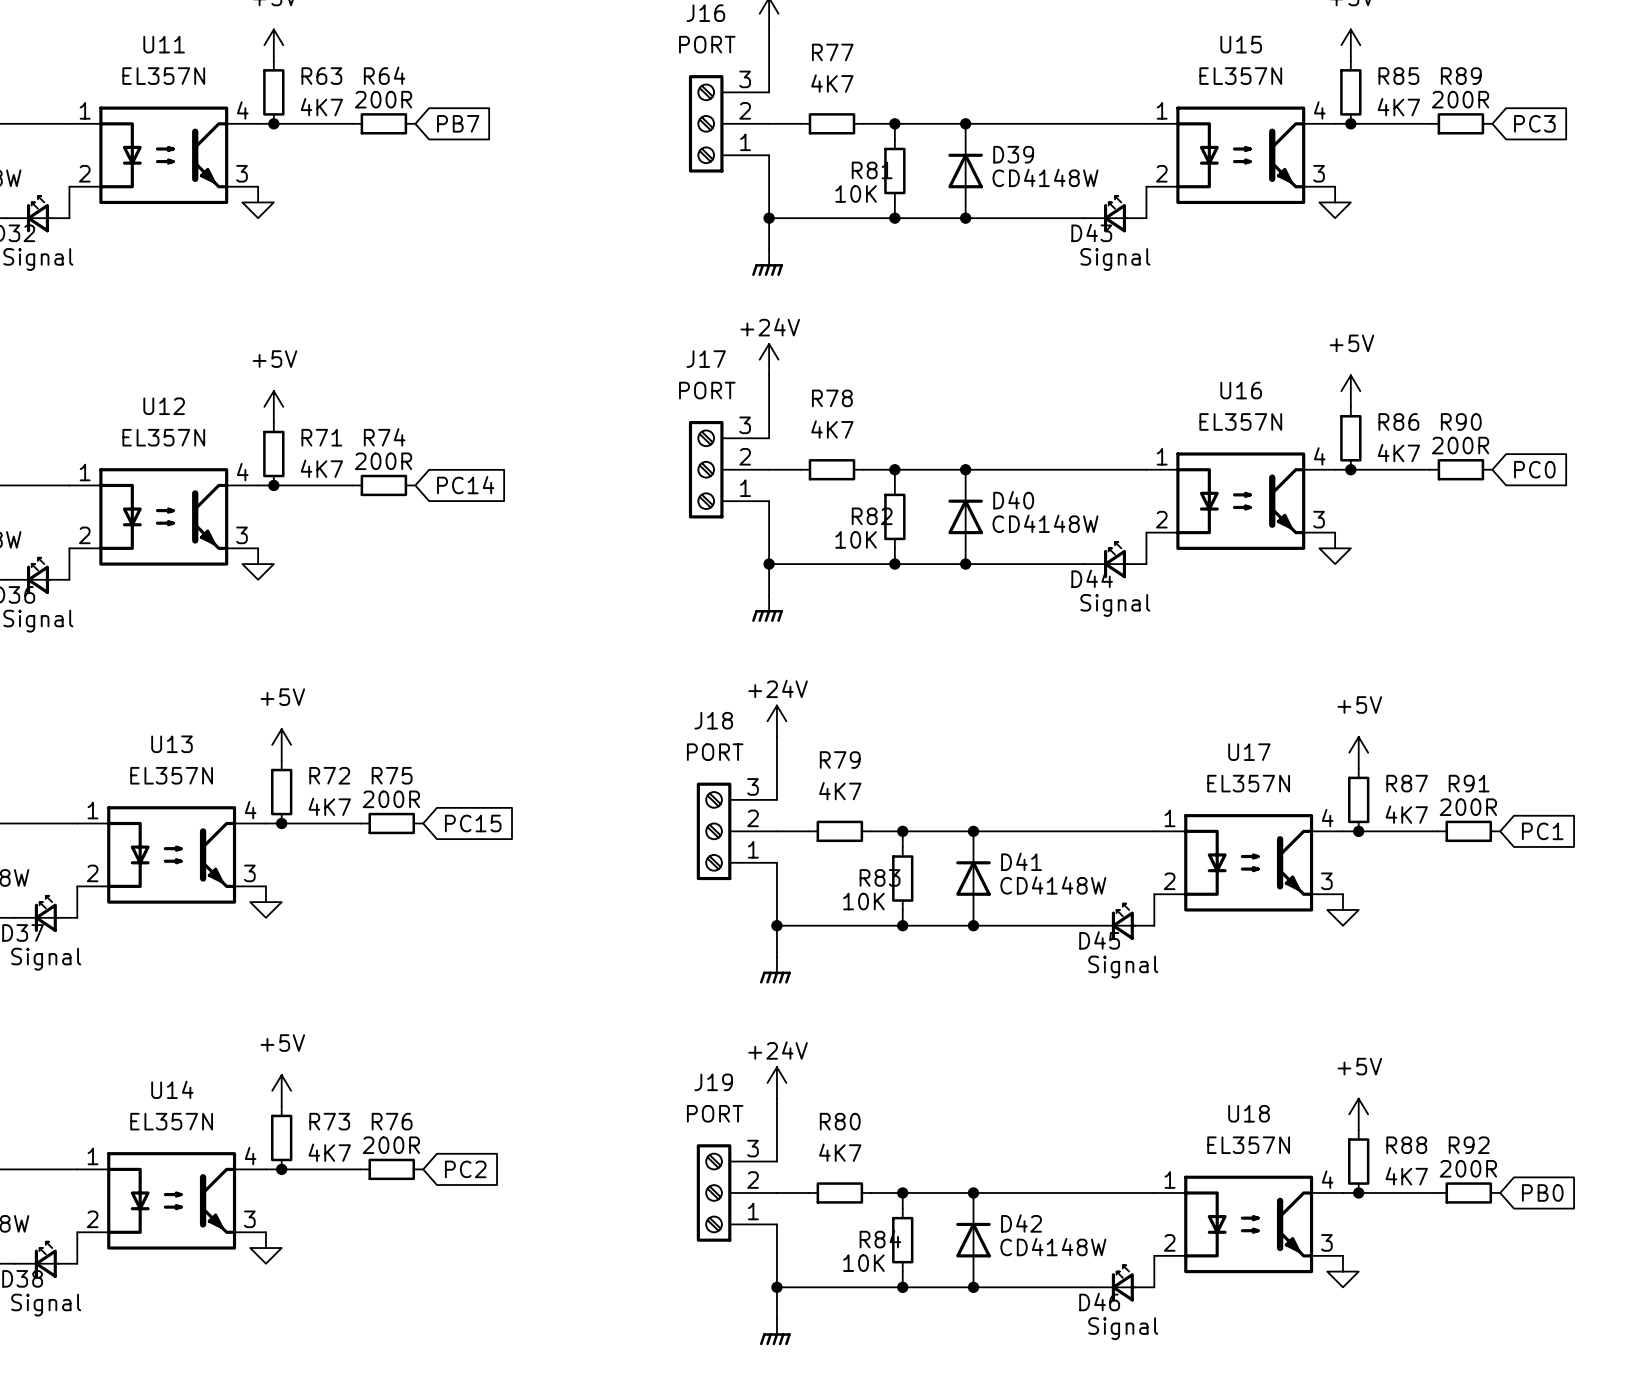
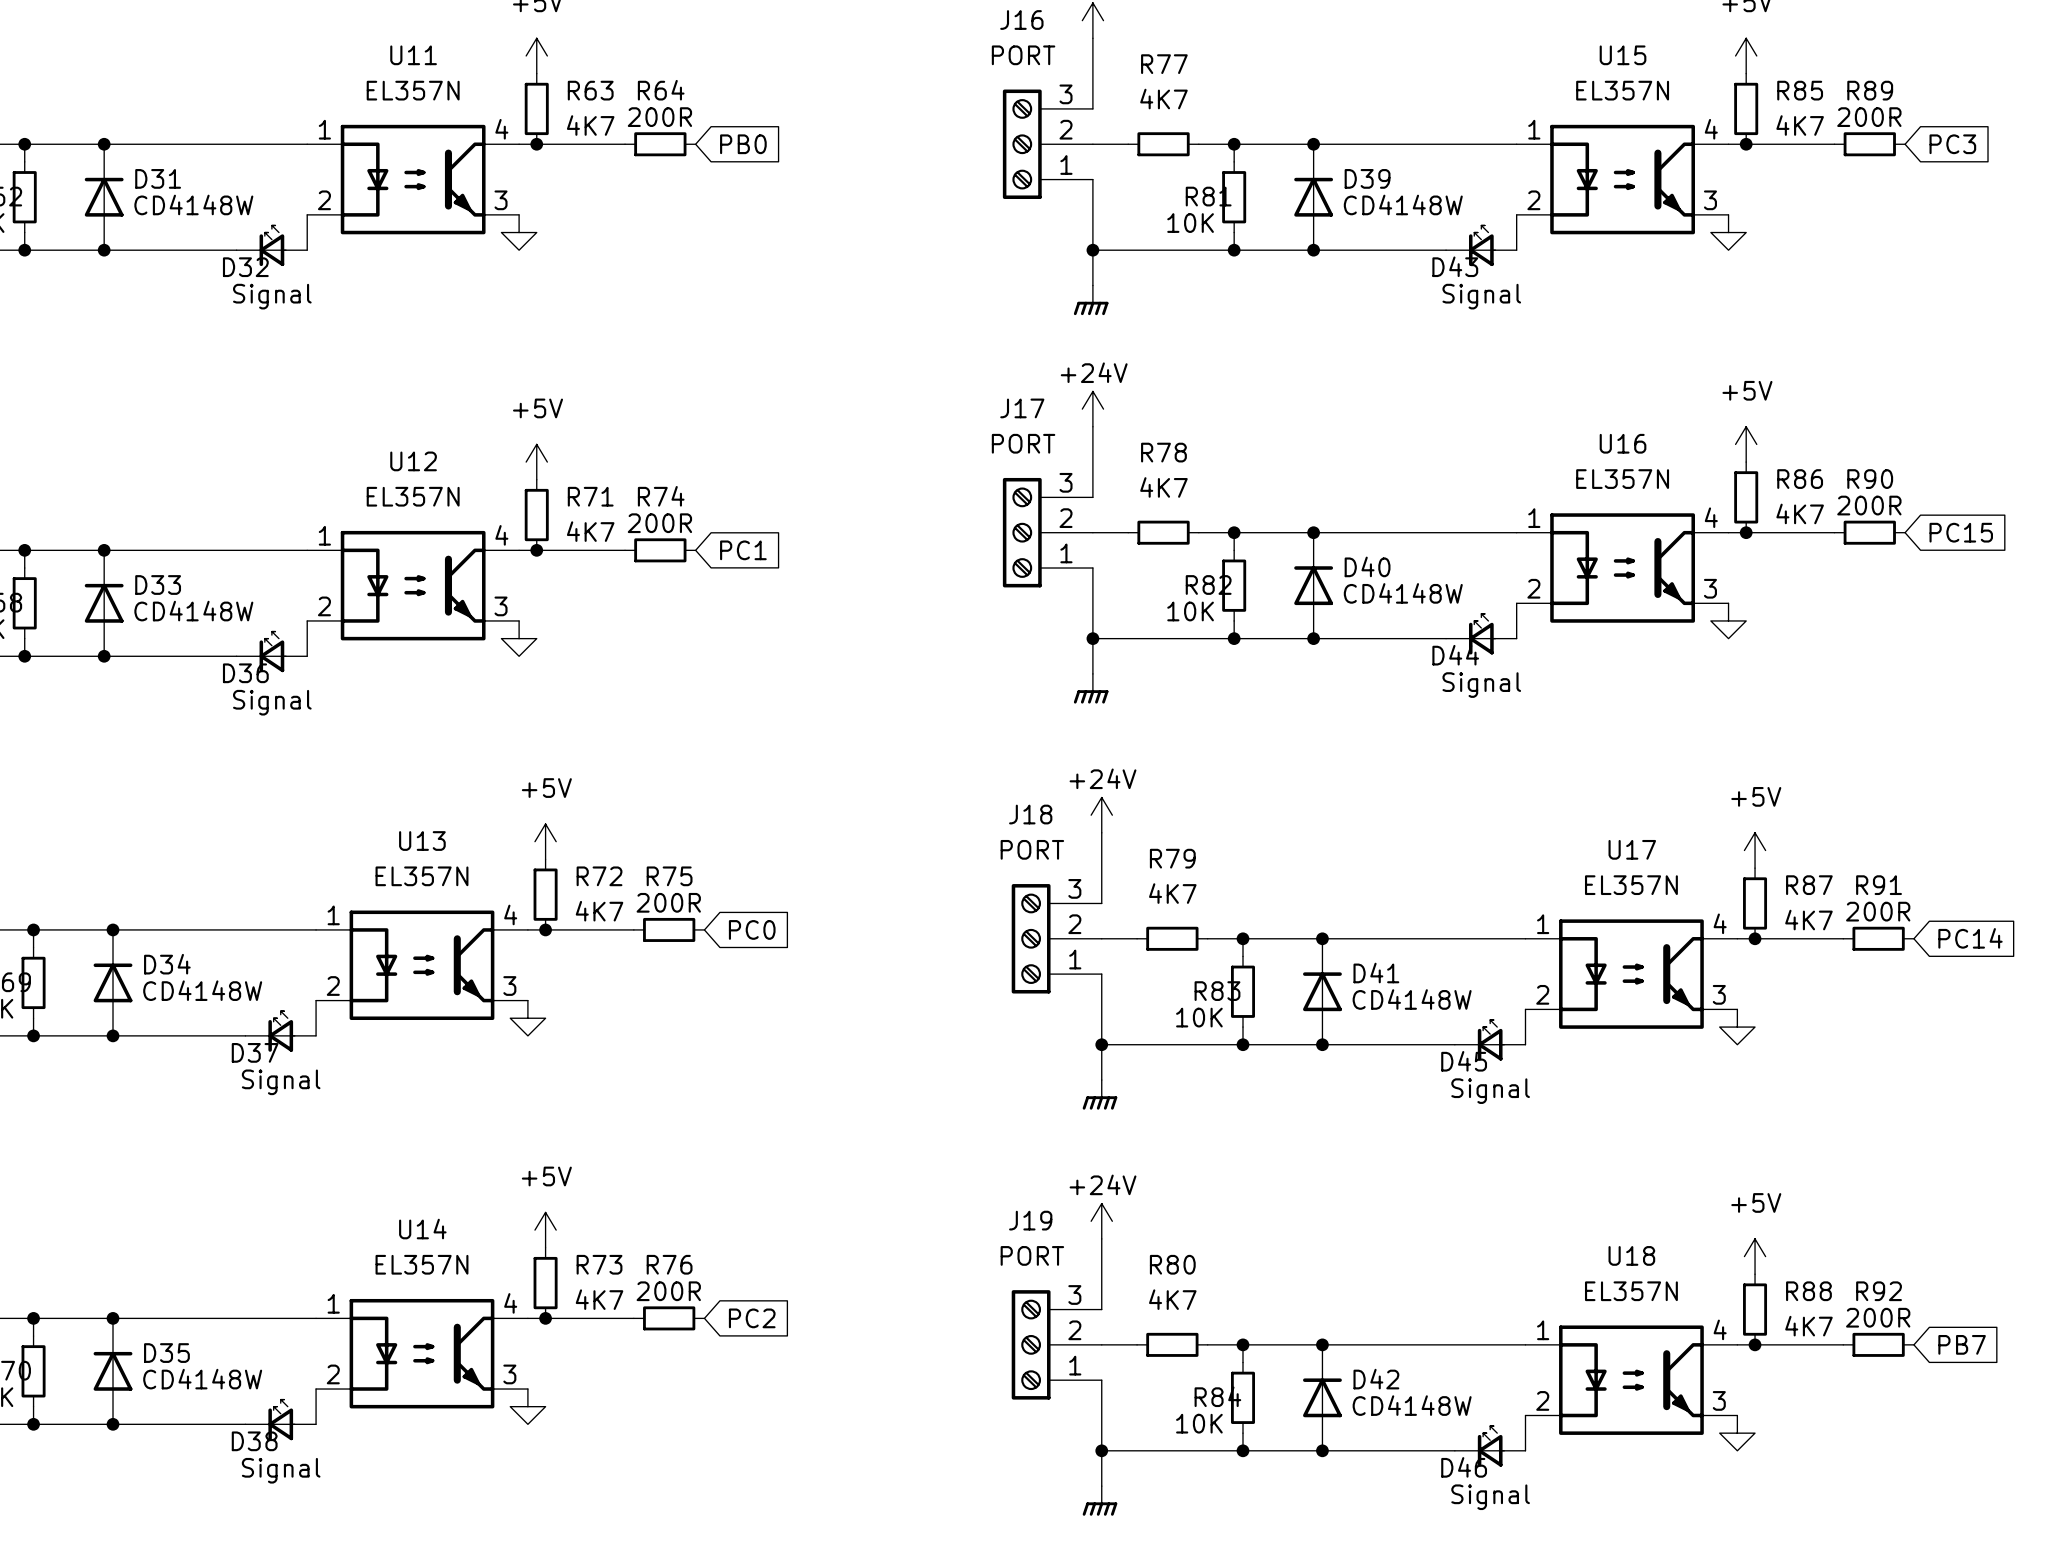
global label: PB7 (458, 123) -> PB0 (743, 144)
global label: PC0 (1534, 469) -> PC15 (1961, 532)
global label: PC14 (465, 485) -> PC1 (743, 550)
global label: PC15 (473, 823) -> PC0 (752, 929)
global label: PC1 (1542, 831) -> PC14 (1970, 938)
global label: PB0 (1542, 1192) -> PB7 (1962, 1344)

